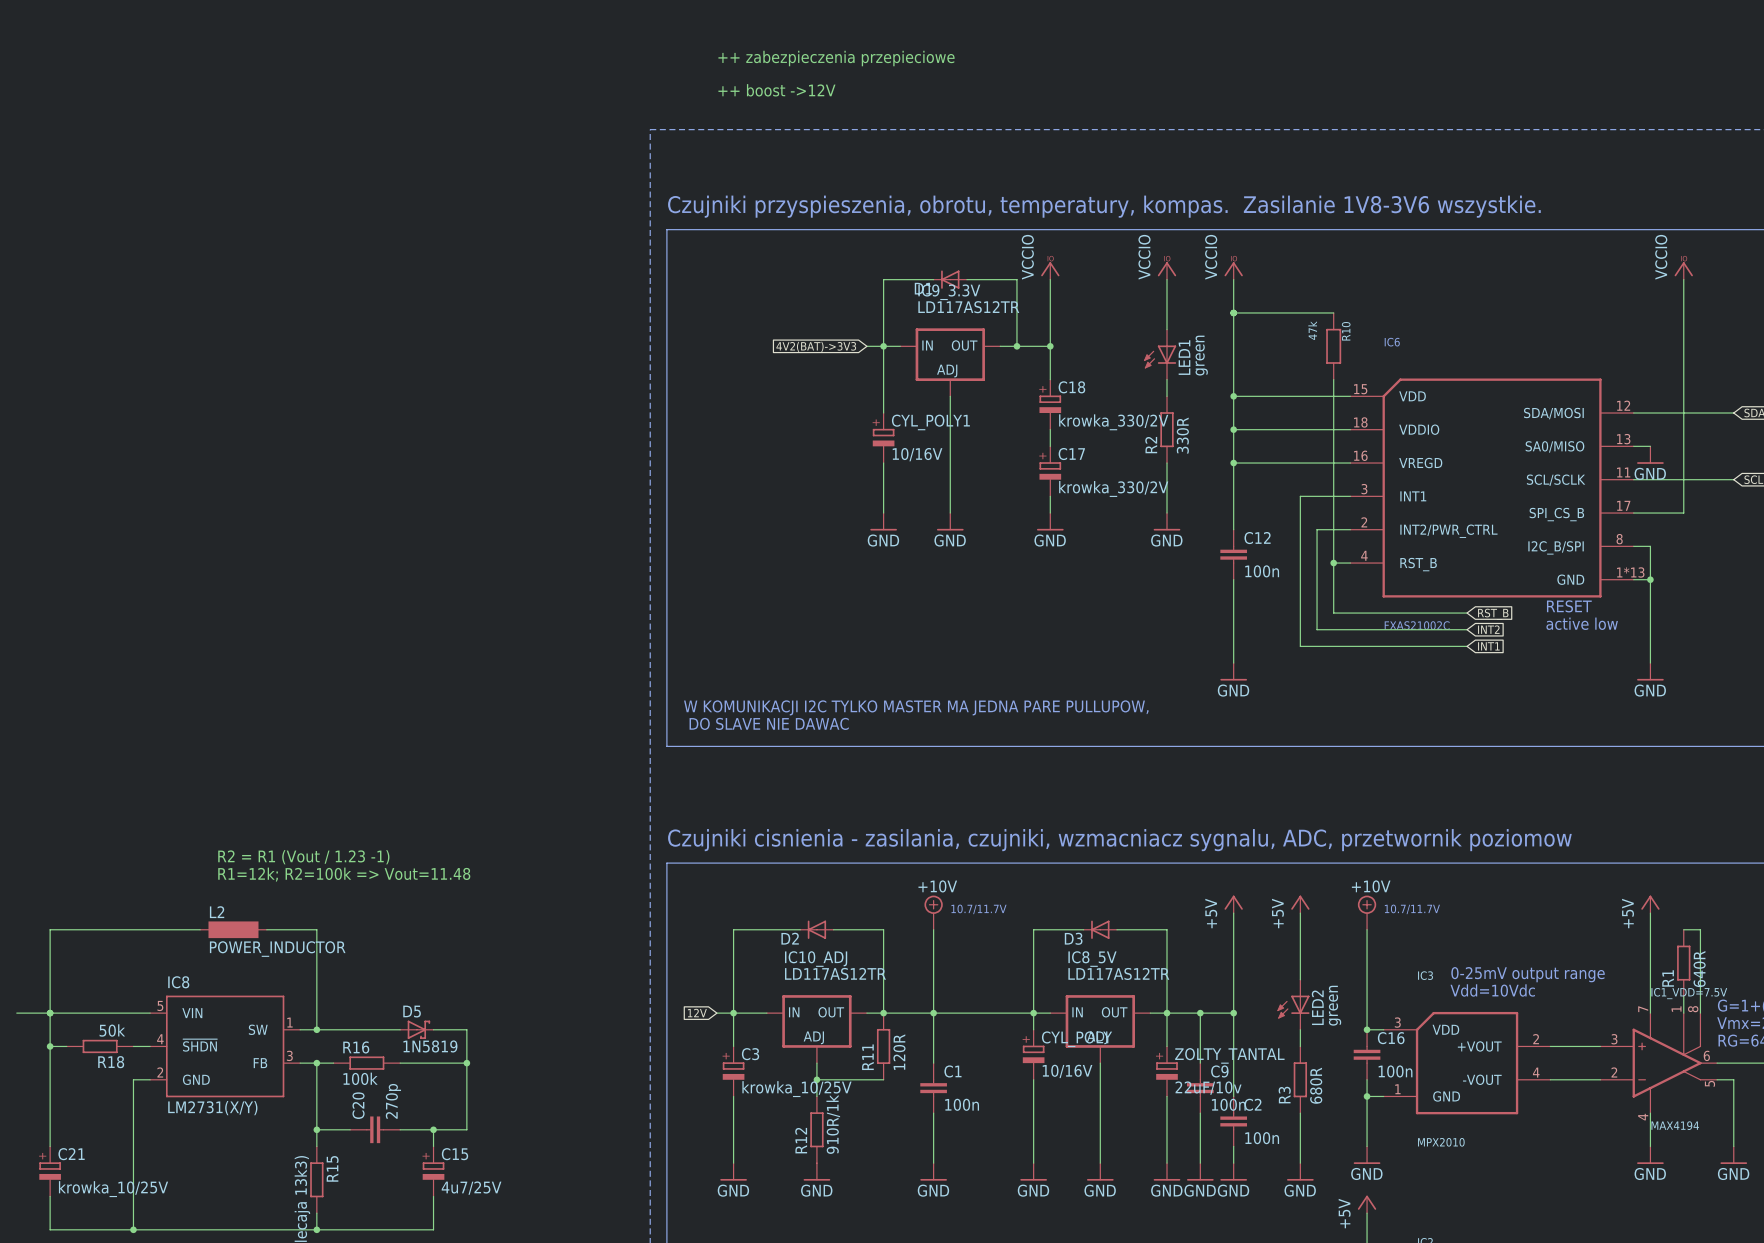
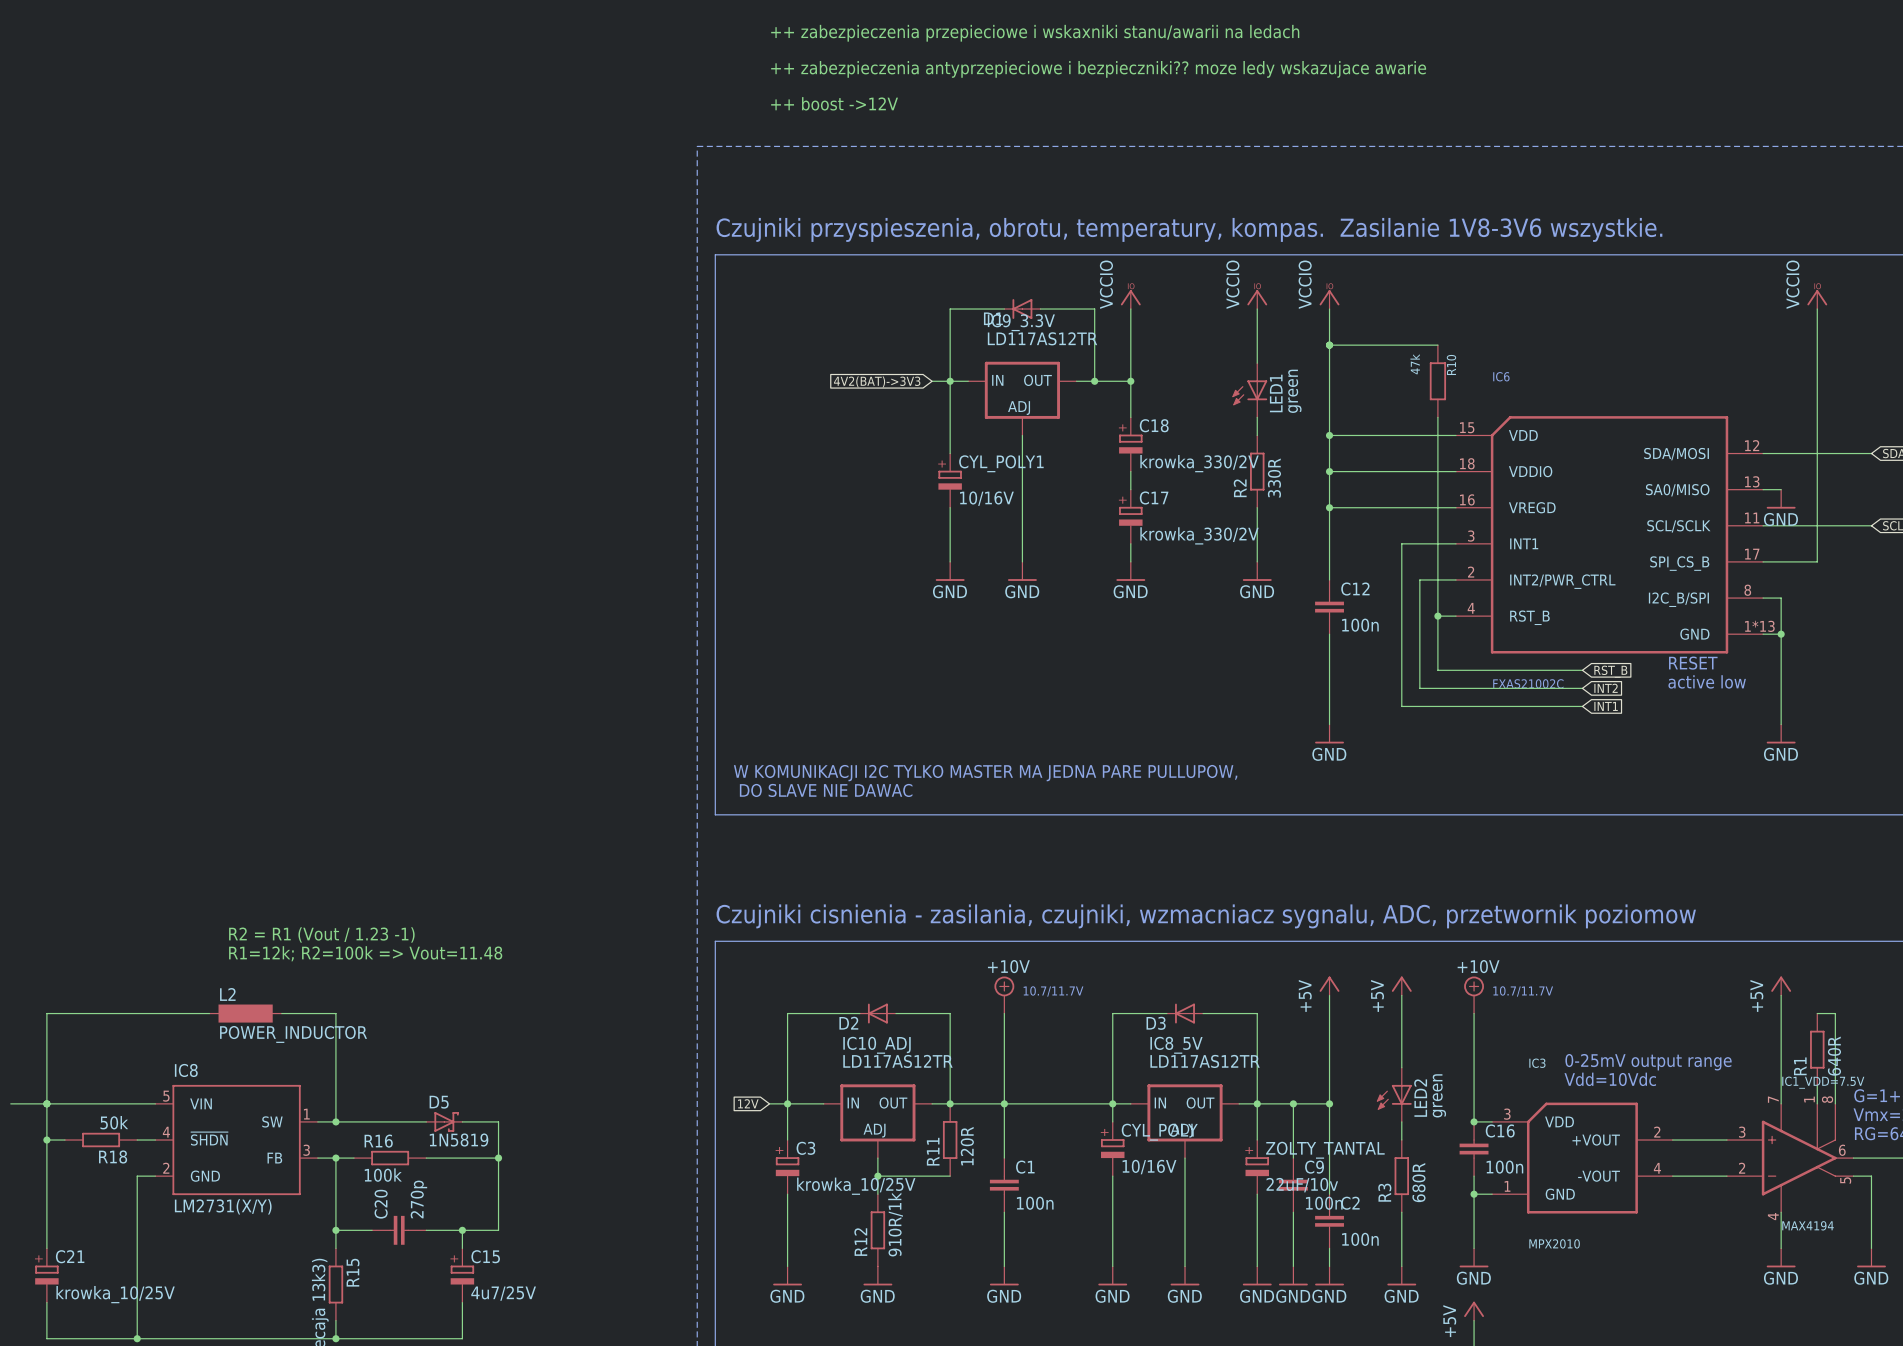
text: none -> ++ zabezpieczenia przepieciowe i wskaxniki stanu/awarii na ledach (1035, 33)
text: ++ zabezpieczenia przepieciowe (836, 58) -> ++ zabezpieczenia antyprzepieciowe i bezpieczniki?? moze ledy wskazujace awarie (1098, 69)

